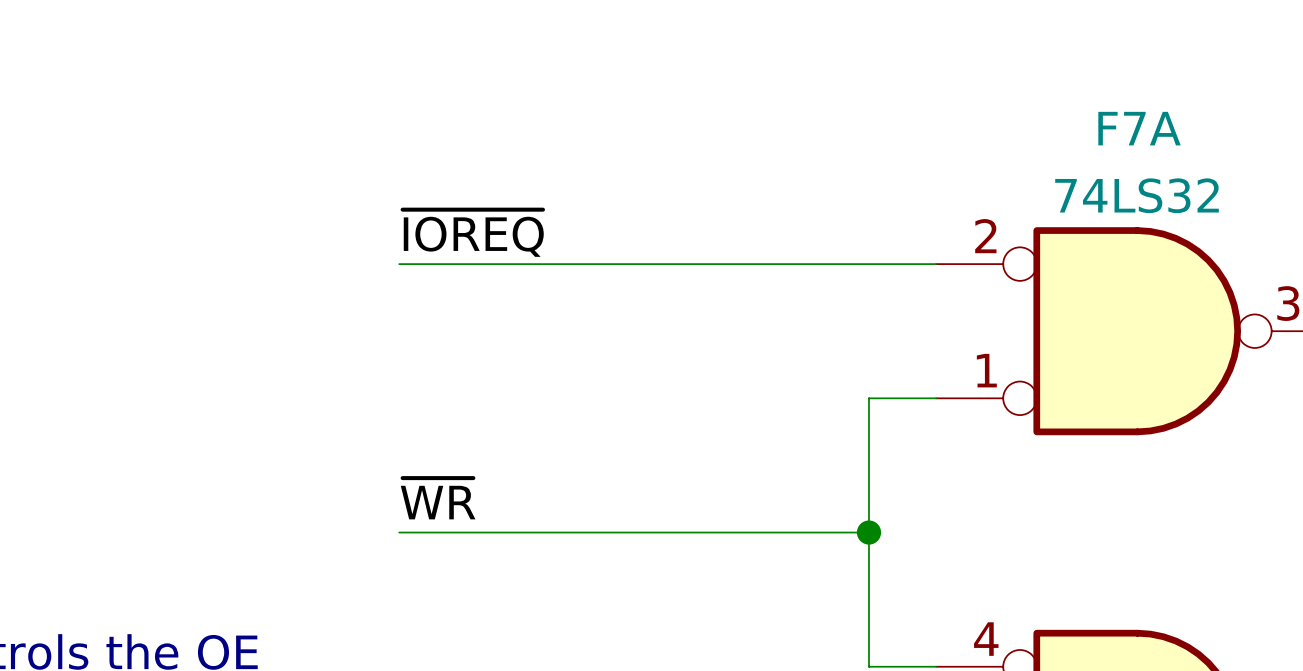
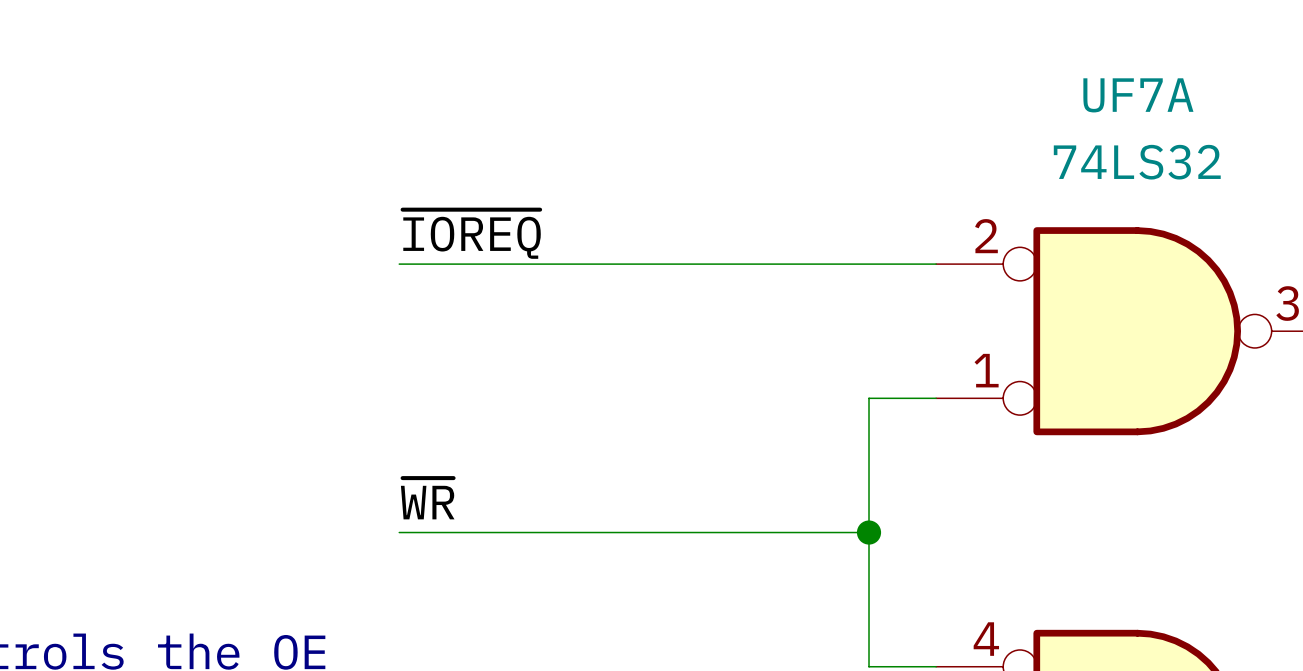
F7A name: F7A (1139, 128) -> UF7A (1138, 95)
F7A value position: 74LS32 (1137, 195) -> 74LS32 (1137, 162)

